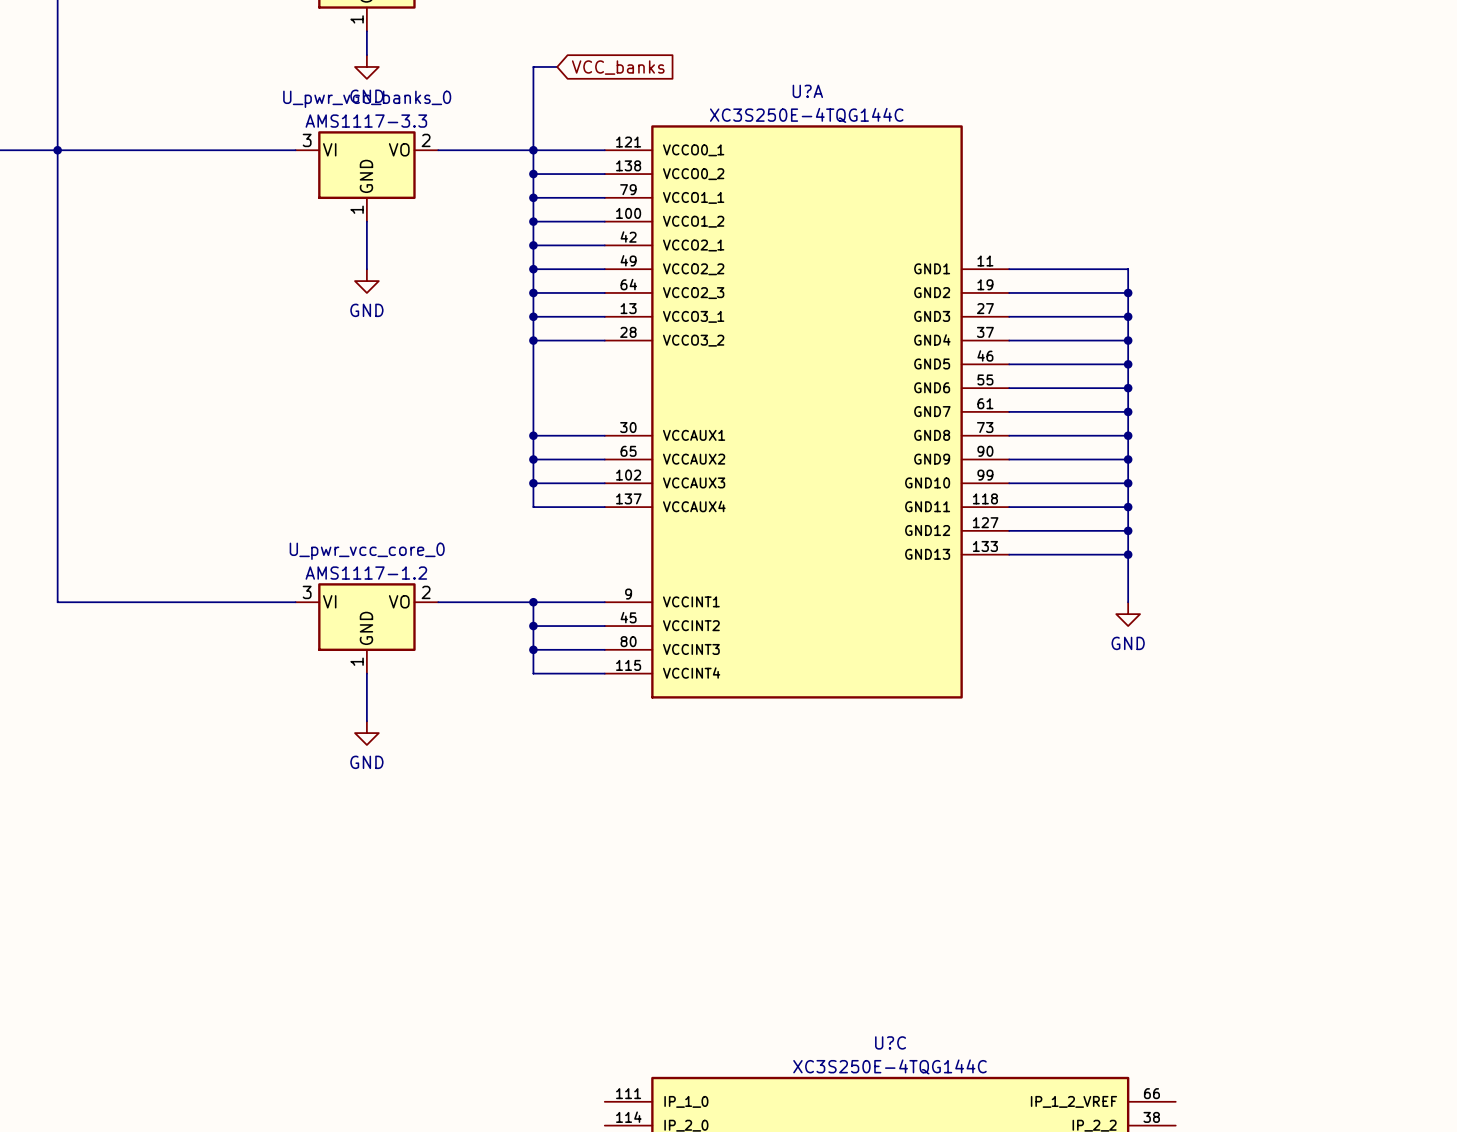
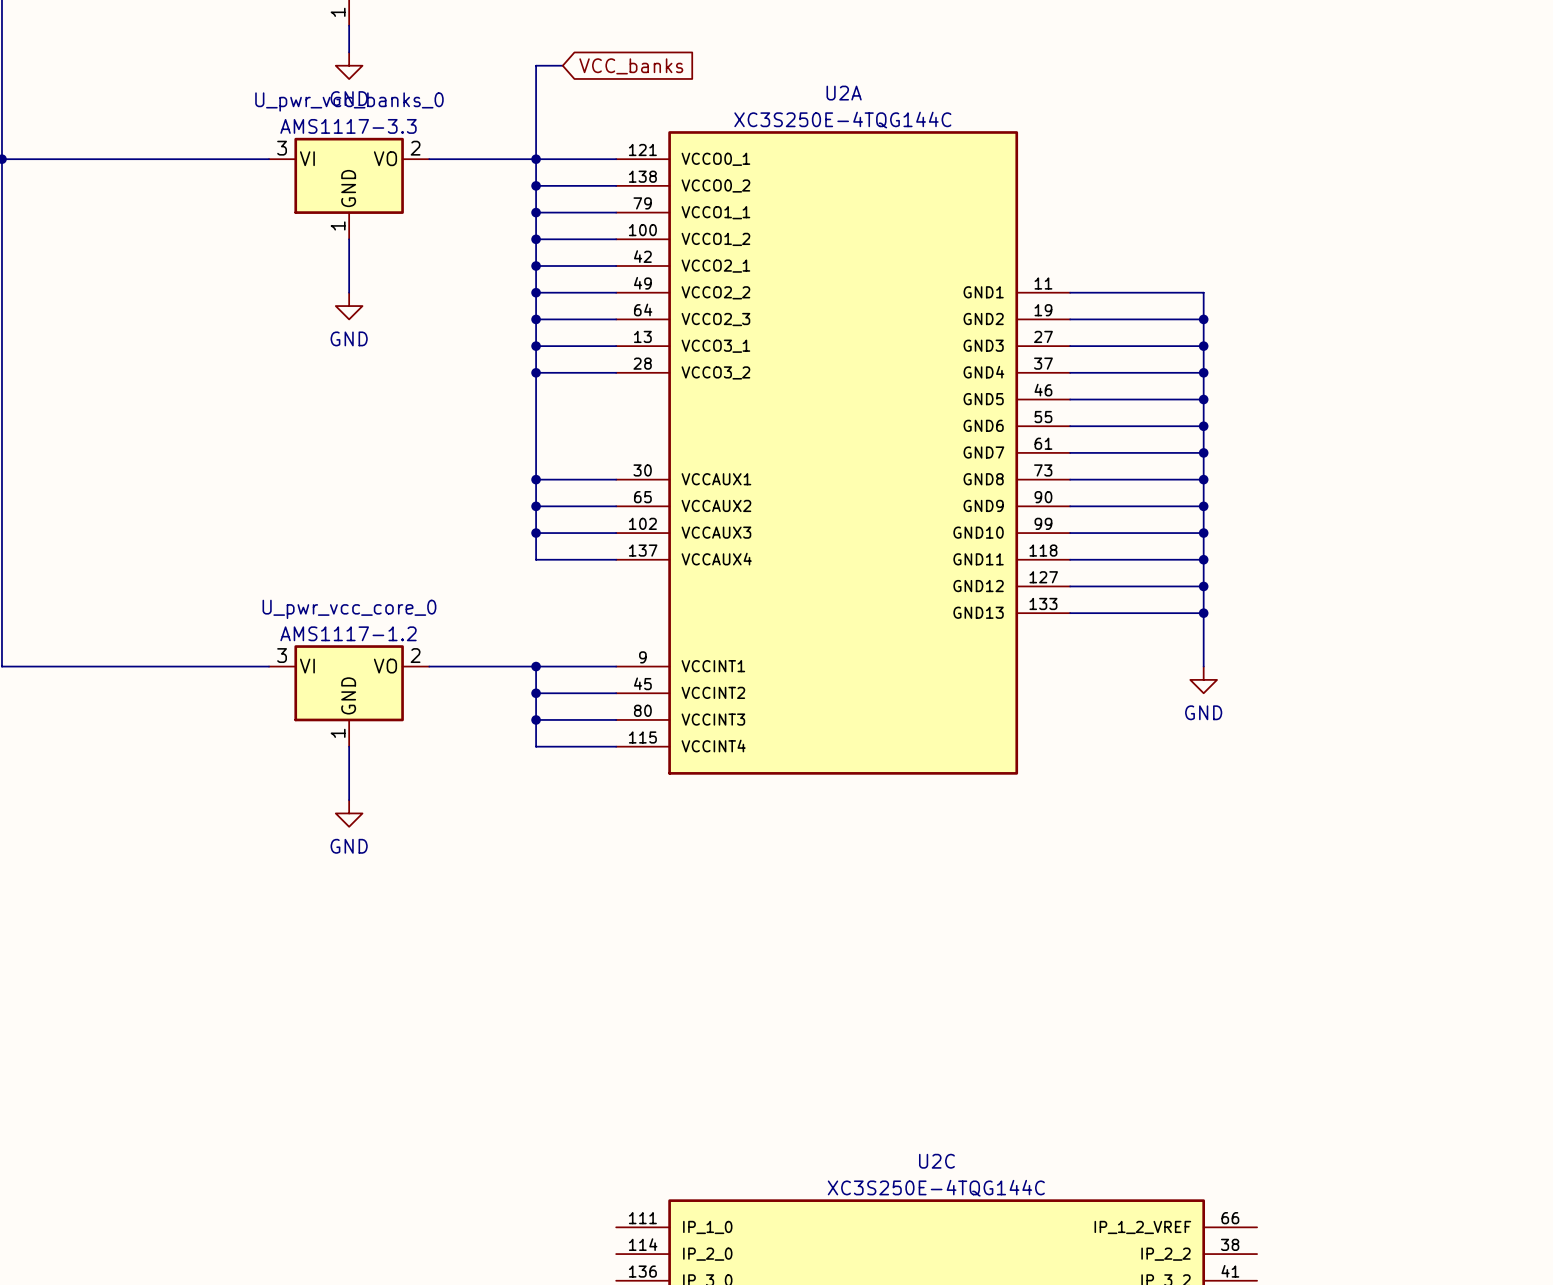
U?A name: U?A (807, 91) -> U2A (844, 93)
U?C name: U?C (890, 1042) -> U2C (936, 1161)

